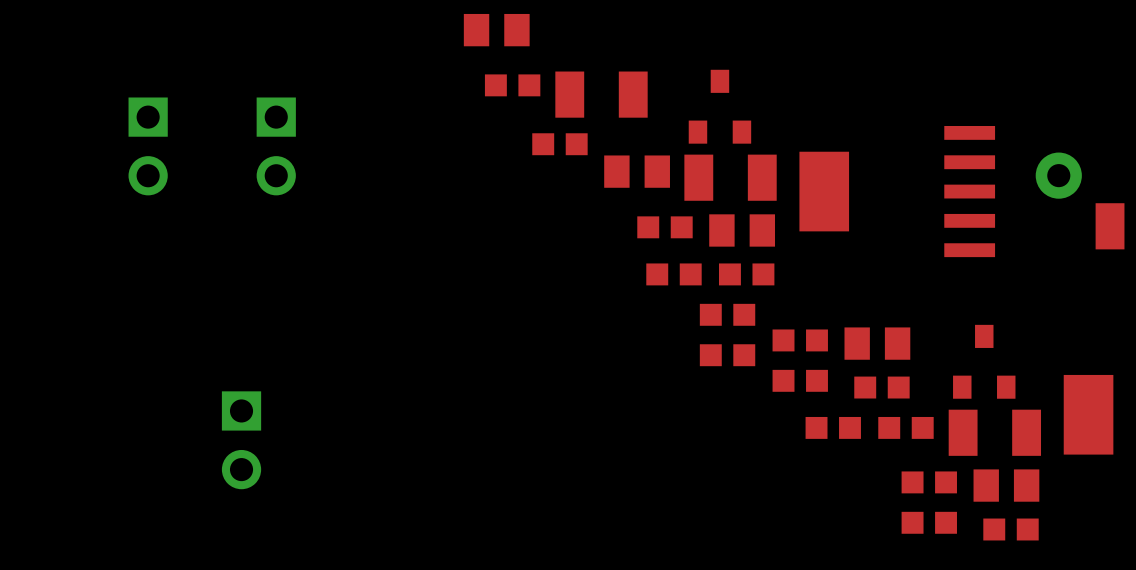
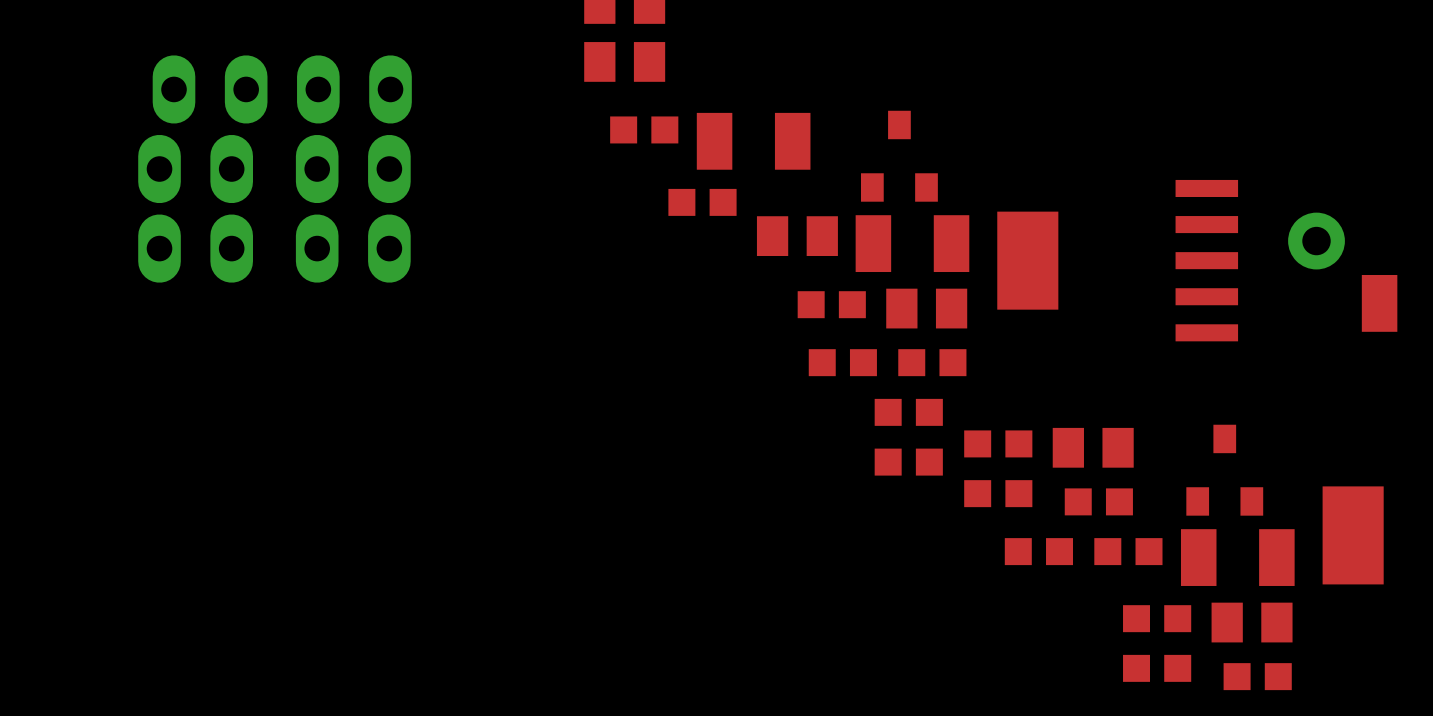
part: none -> (282, 89)
part: none -> (195, 169)
part: none -> (353, 169)
part: (148, 146) -> none
part: (276, 146) -> none
part: none -> (195, 248)
part: none -> (353, 248)
part: (241, 440) -> none

